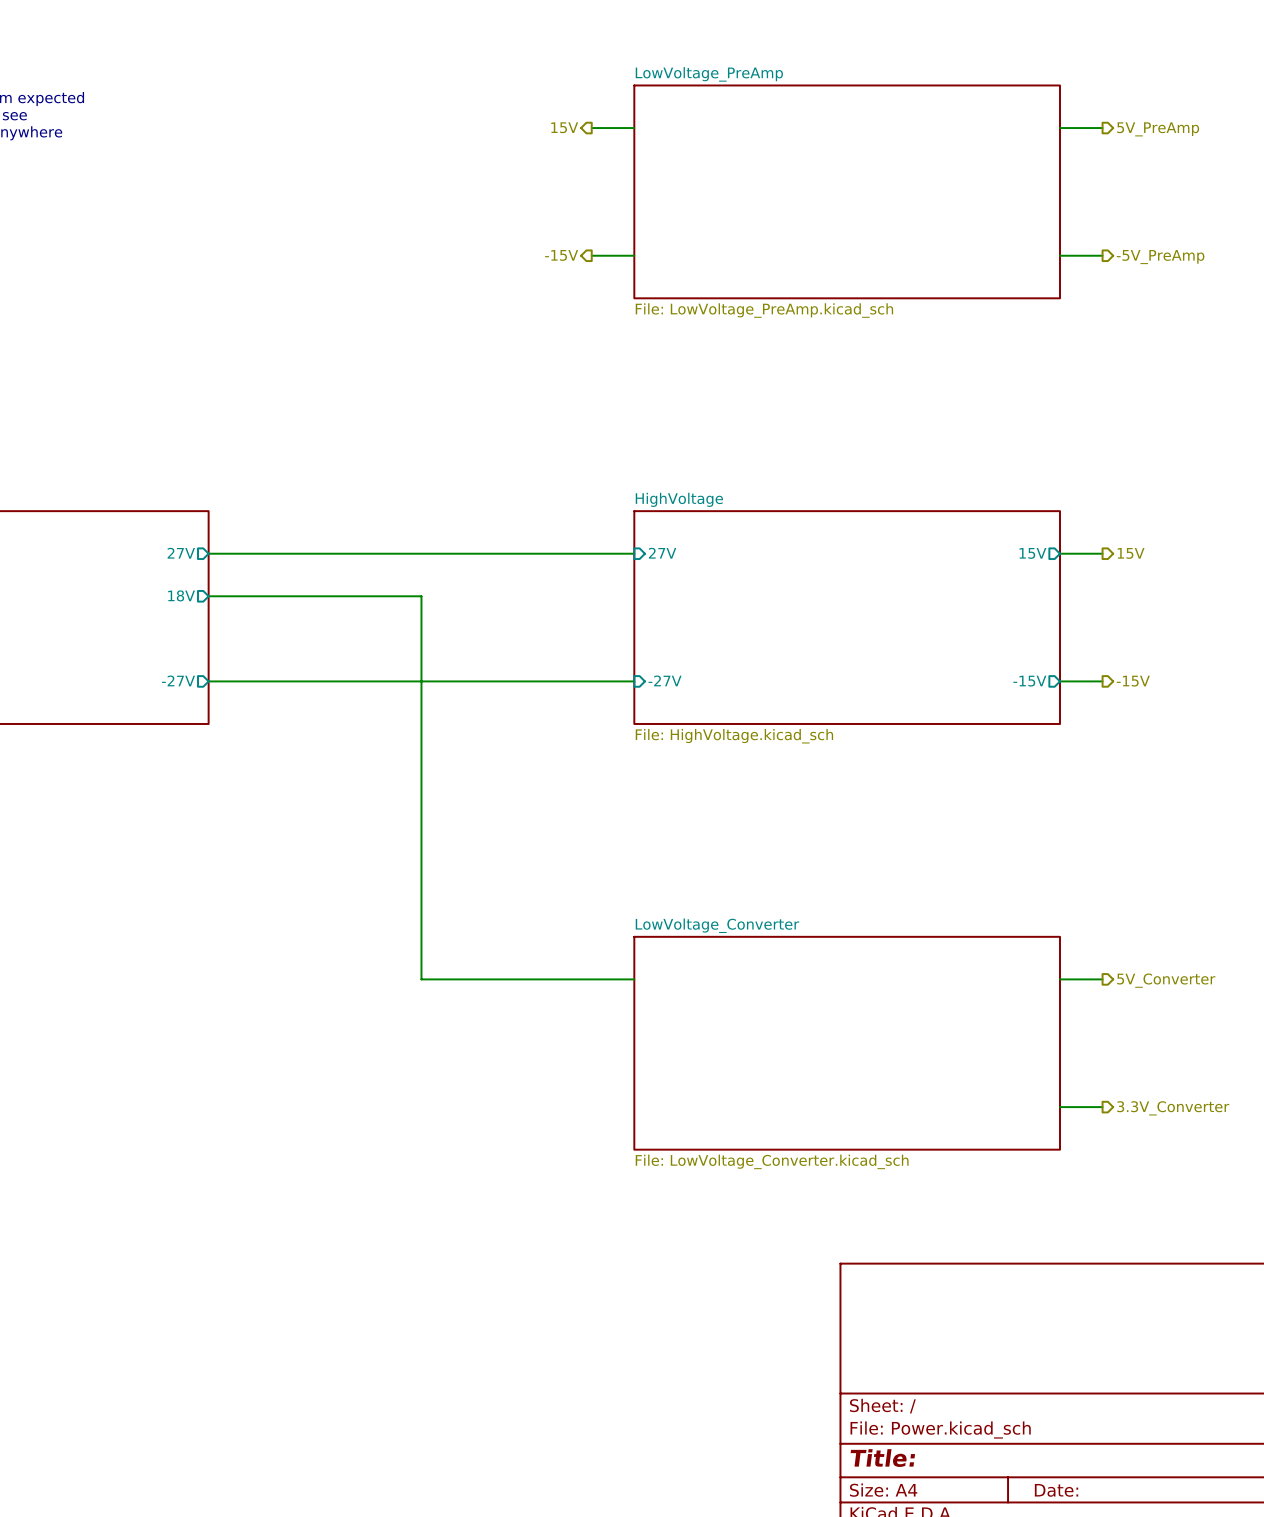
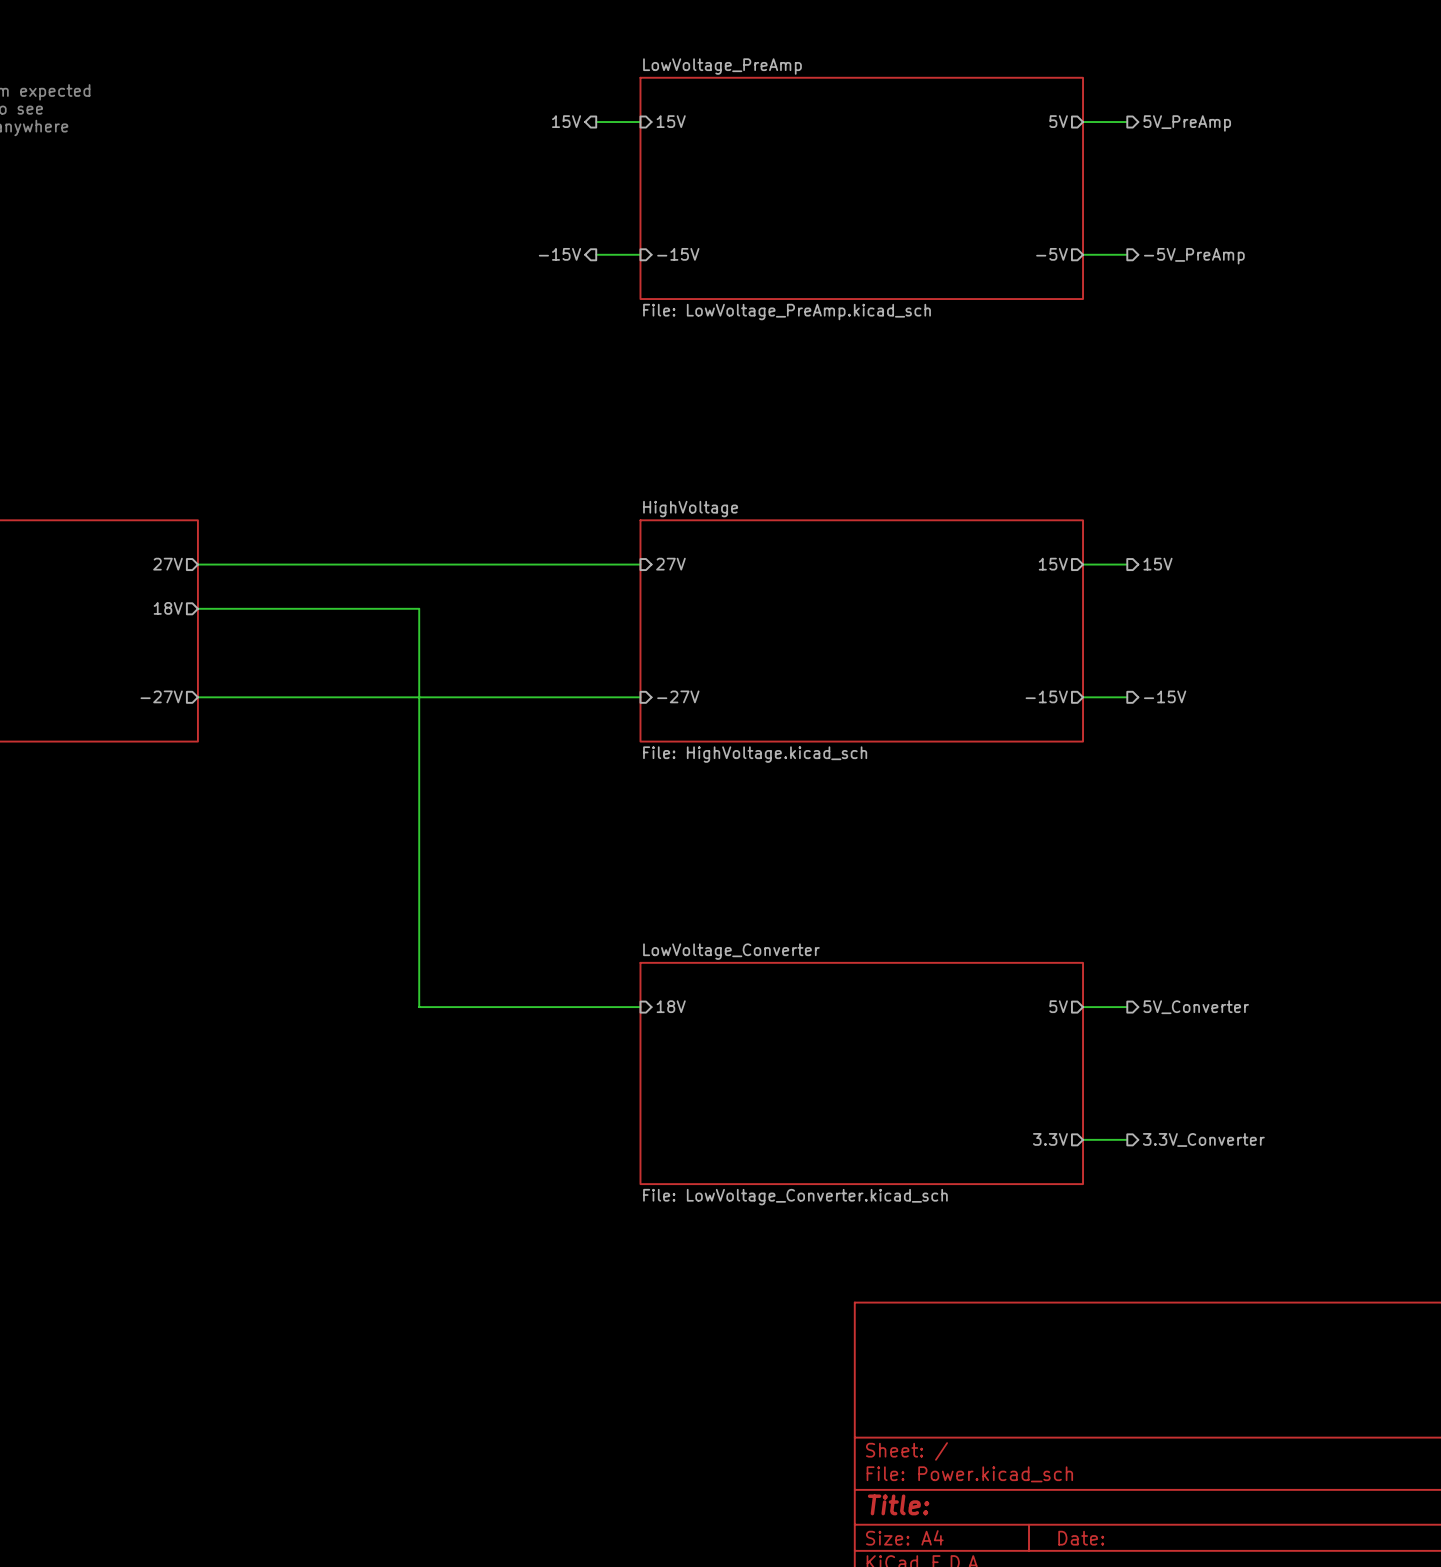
sheet pin: none -> 15V (671, 121)
sheet pin: none -> 5V (1058, 121)
sheet pin: none -> -15V (678, 254)
sheet pin: none -> -5V (1052, 254)
sheet pin: none -> 18V (671, 1006)
sheet pin: none -> 5V (1058, 1006)
sheet pin: none -> 3.3V (1050, 1139)

